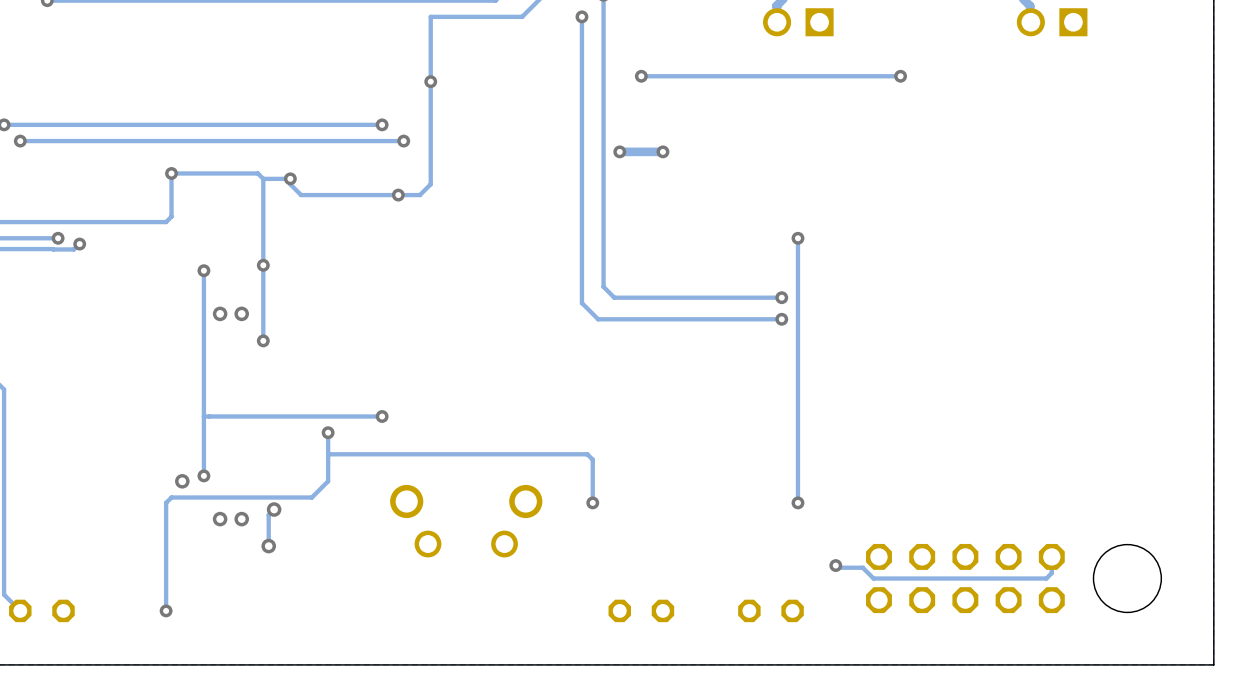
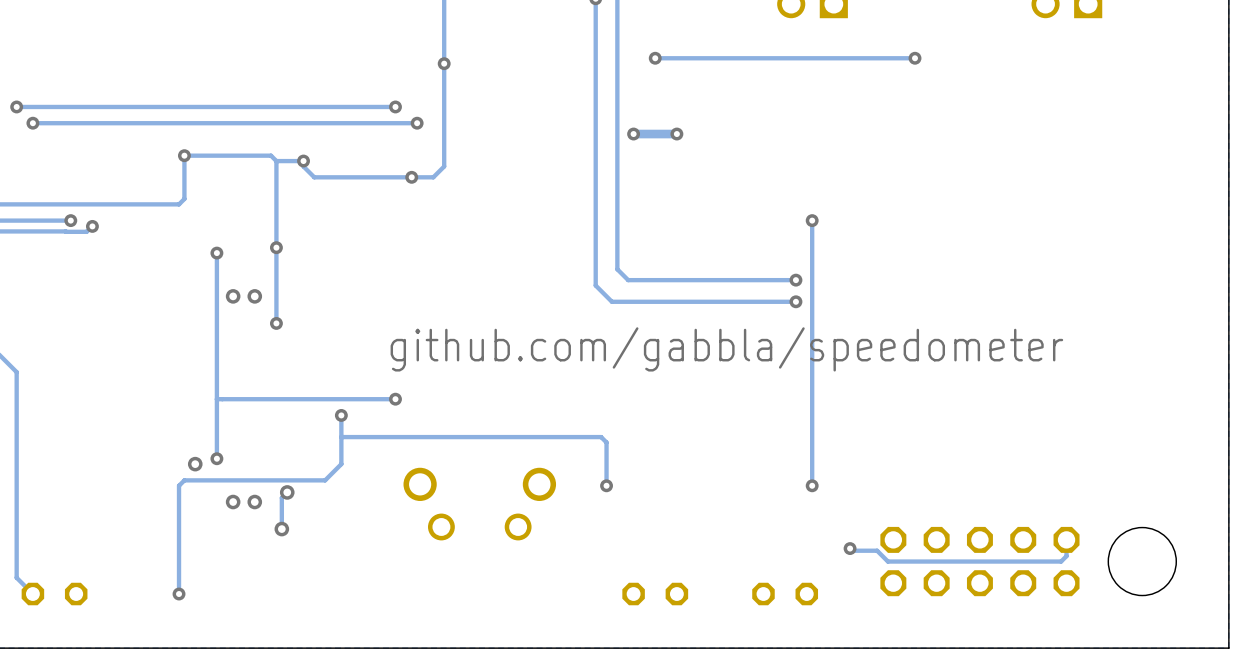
text: none -> github.com/gabbla/speedometer (726, 349)

